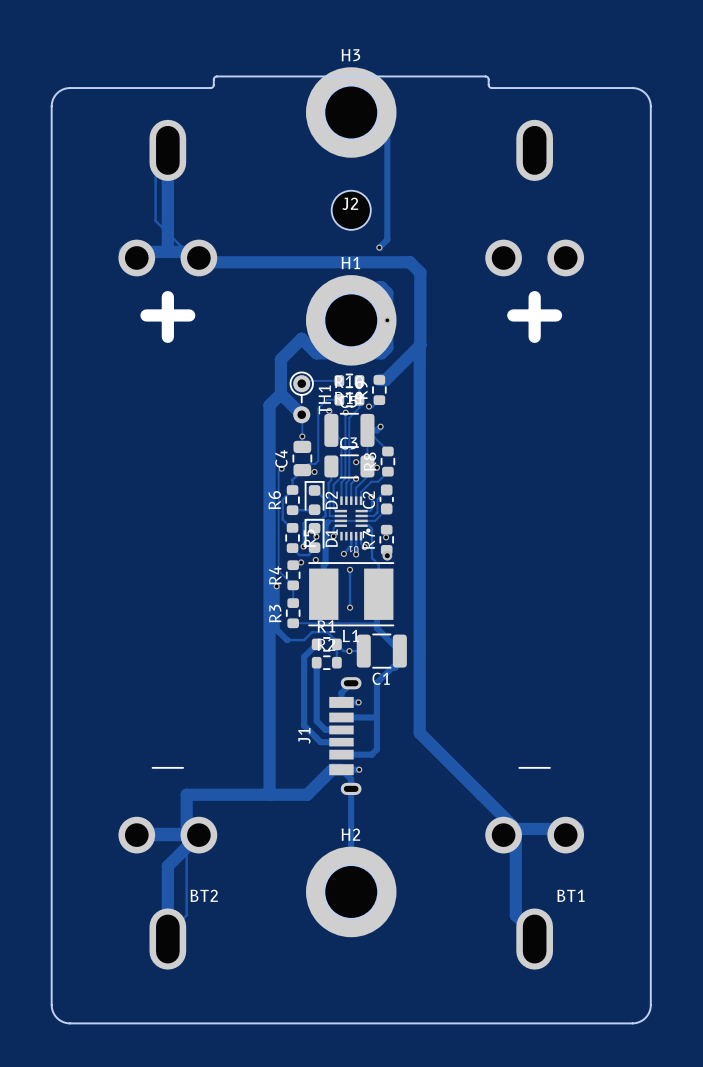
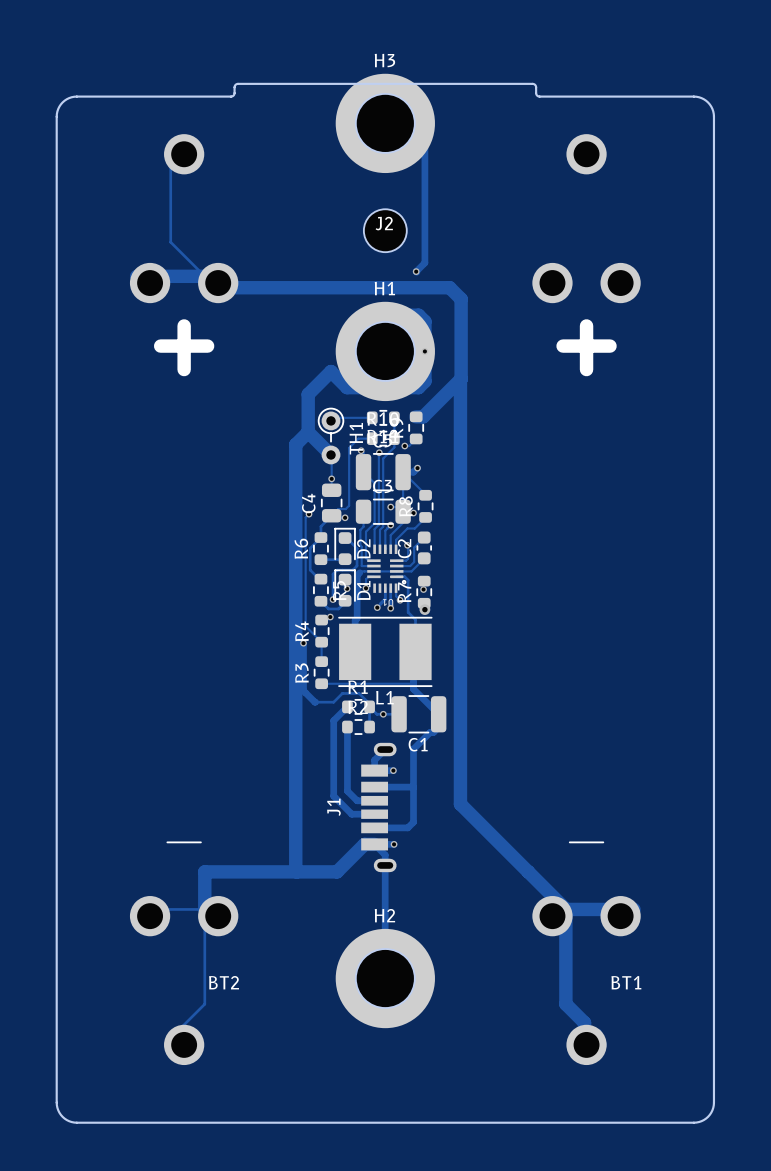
BT2 footprint: [118, 119, 218, 970] -> [129, 134, 239, 1066]
BT1 footprint: [485, 119, 585, 970] -> [532, 134, 641, 1066]
track: (167, 150) (167, 248) (164, 251) -> none
via: (315, 560) -> none
track: (350, 569) (350, 607) -> none
via: (350, 569) -> none
via: (350, 607) -> none
track: (136, 835) (198, 835) (167, 866) (167, 939) -> none

